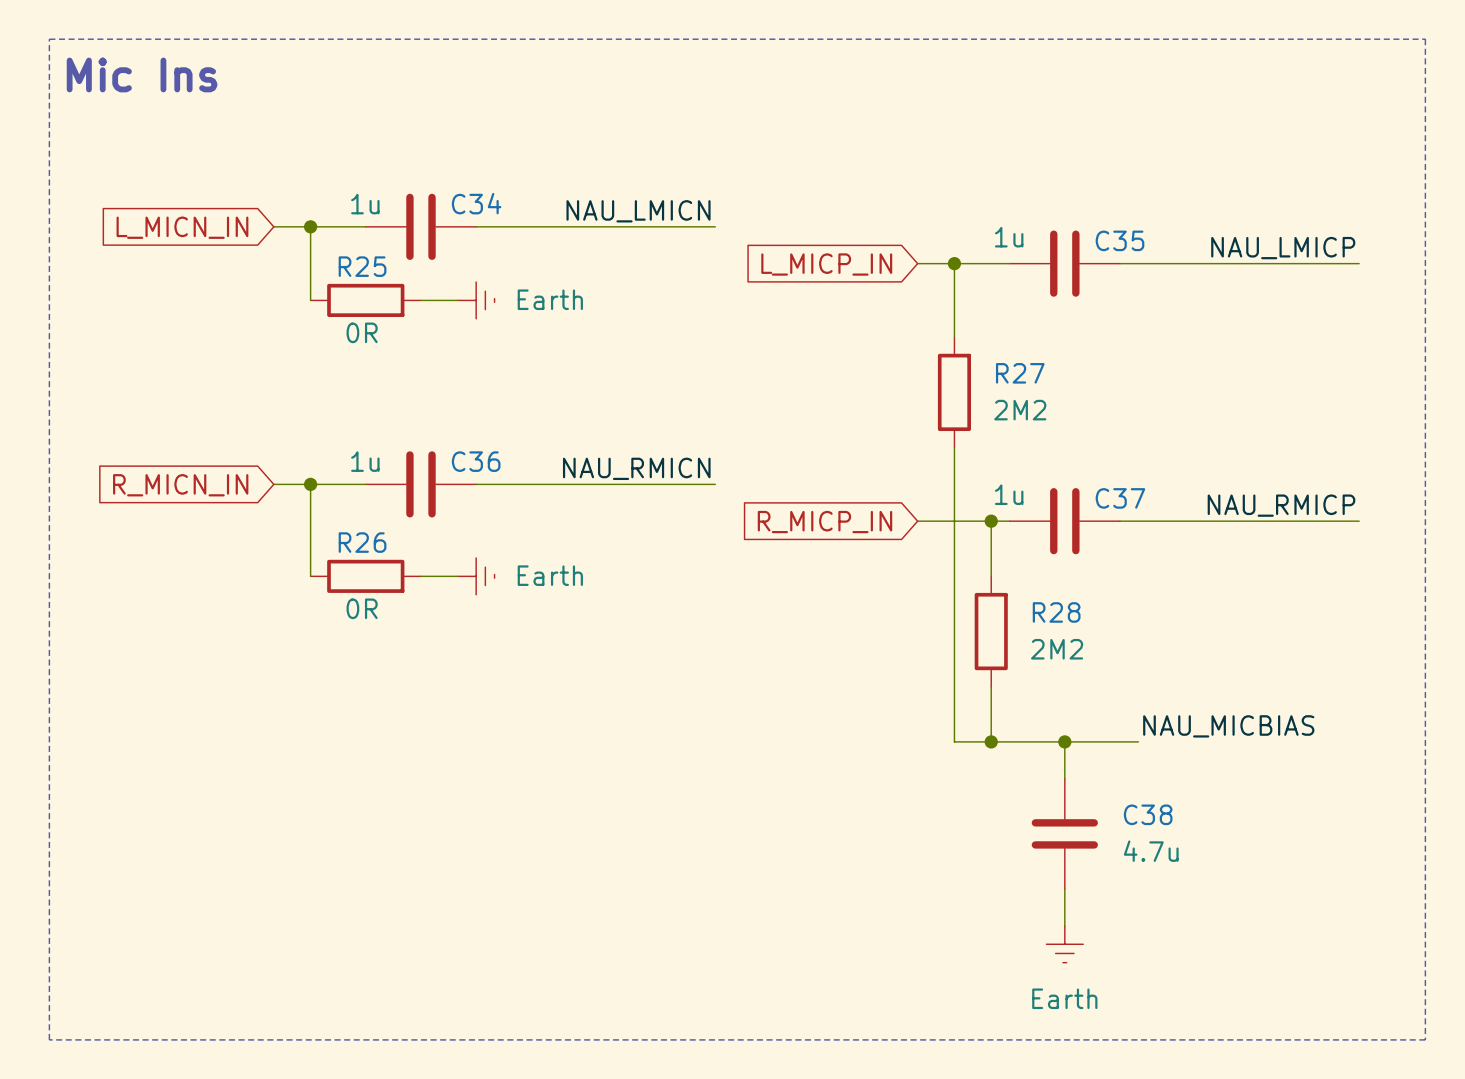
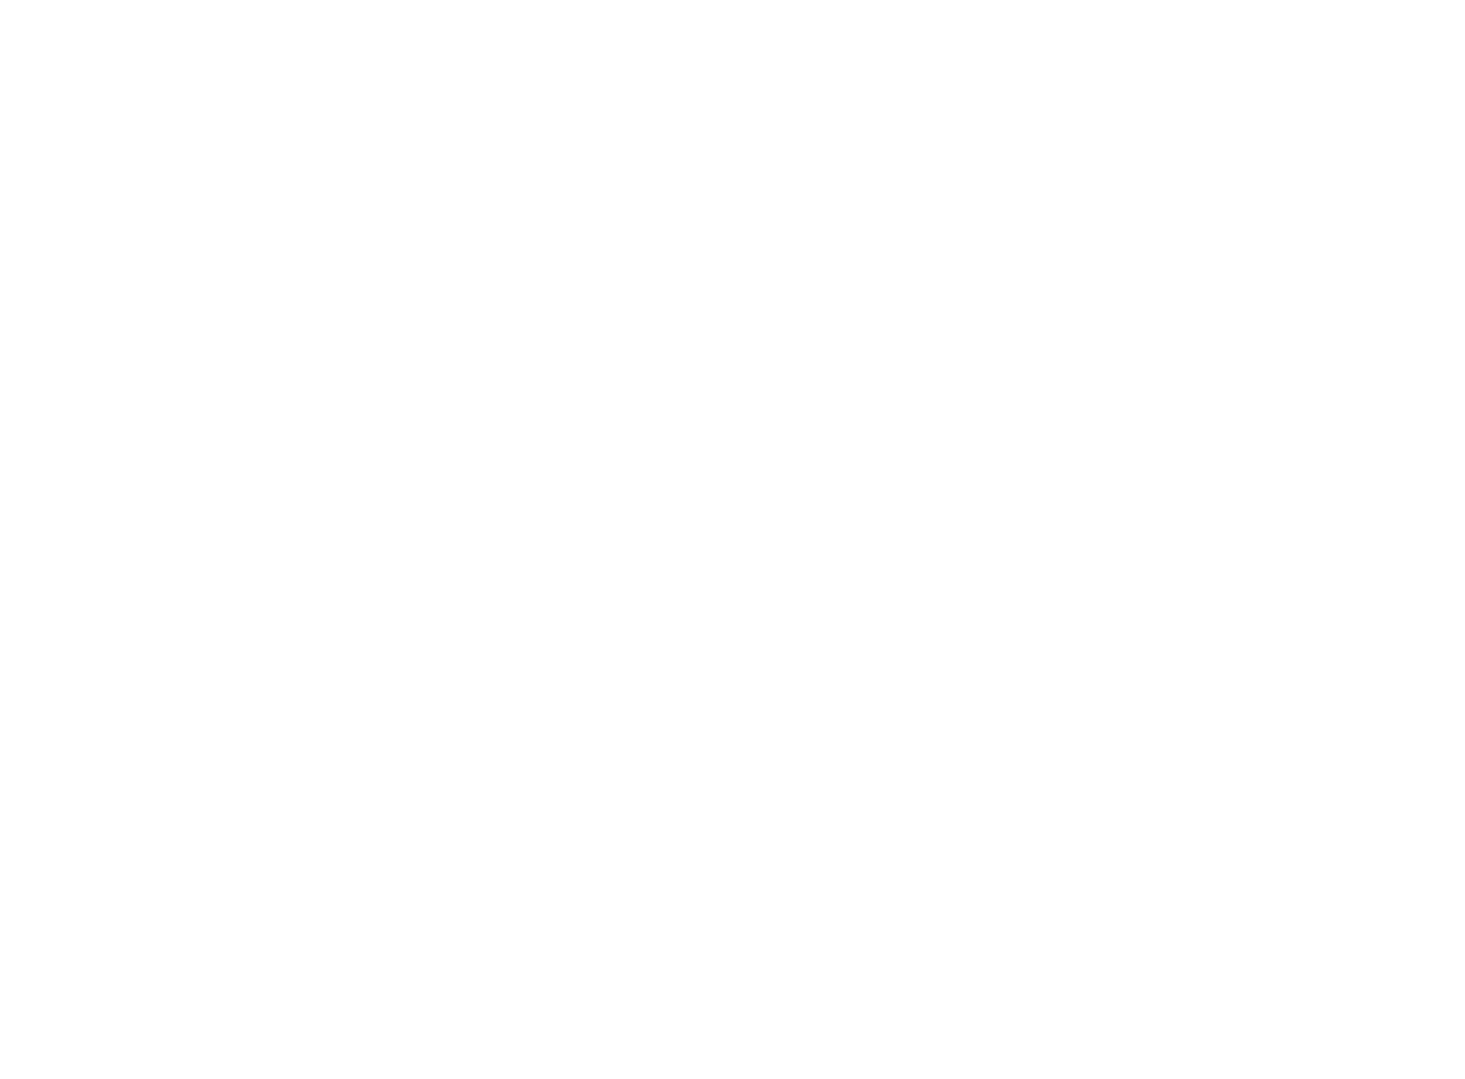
line: (49, 39) (1425, 39) (1425, 1039) (49, 1039) (49, 39) -> none
text: Mic Ins (142, 74) -> none
label: NAU_LMICN (638, 211) -> none
wire: (273, 226) (365, 226) -> none
wire: (310, 226) (310, 300) -> none
junction: (310, 226) -> none
C34: 1u (420, 226) -> none
wire: (476, 226) (715, 226) -> none
global label: L_MICN_IN (182, 227) -> none
label: NAU_LMICP (1283, 248) -> none
wire: (917, 263) (1009, 263) -> none
wire: (954, 263) (954, 337) -> none
junction: (954, 263) -> none
C35: 1u (1064, 263) -> none
wire: (1120, 263) (1359, 263) -> none
global label: L_MICP_IN (826, 264) -> none
R25: 0R (365, 300) -> none
wire: (420, 300) (457, 300) -> none
power symbol: Earth (476, 300) -> none
R27: 2M2 (954, 392) -> none
wire: (954, 447) (954, 741) (1138, 741) -> none
label: NAU_RMICN (636, 468) -> none
wire: (273, 484) (365, 484) -> none
wire: (310, 484) (310, 576) -> none
junction: (310, 484) -> none
C36: 1u (420, 484) -> none
wire: (476, 484) (715, 484) -> none
global label: R_MICN_IN (180, 485) -> none
label: NAU_RMICP (1281, 505) -> none
wire: (917, 521) (1009, 521) -> none
wire: (991, 521) (991, 576) -> none
junction: (991, 521) -> none
C37: 1u (1064, 521) -> none
wire: (1120, 521) (1359, 521) -> none
global label: R_MICP_IN (824, 522) -> none
R26: 0R (365, 576) -> none
wire: (420, 576) (457, 576) -> none
power symbol: Earth (476, 576) -> none
R28: 2M2 (991, 631) -> none
wire: (991, 686) (991, 741) -> none
label: NAU_MICBIAS (1228, 726) -> none
junction: (991, 741) -> none
wire: (1064, 741) (1064, 778) -> none
junction: (1064, 741) -> none
C38: 4.7u (1064, 833) -> none
wire: (1064, 889) (1064, 925) -> none
power symbol: Earth (1064, 944) -> none

